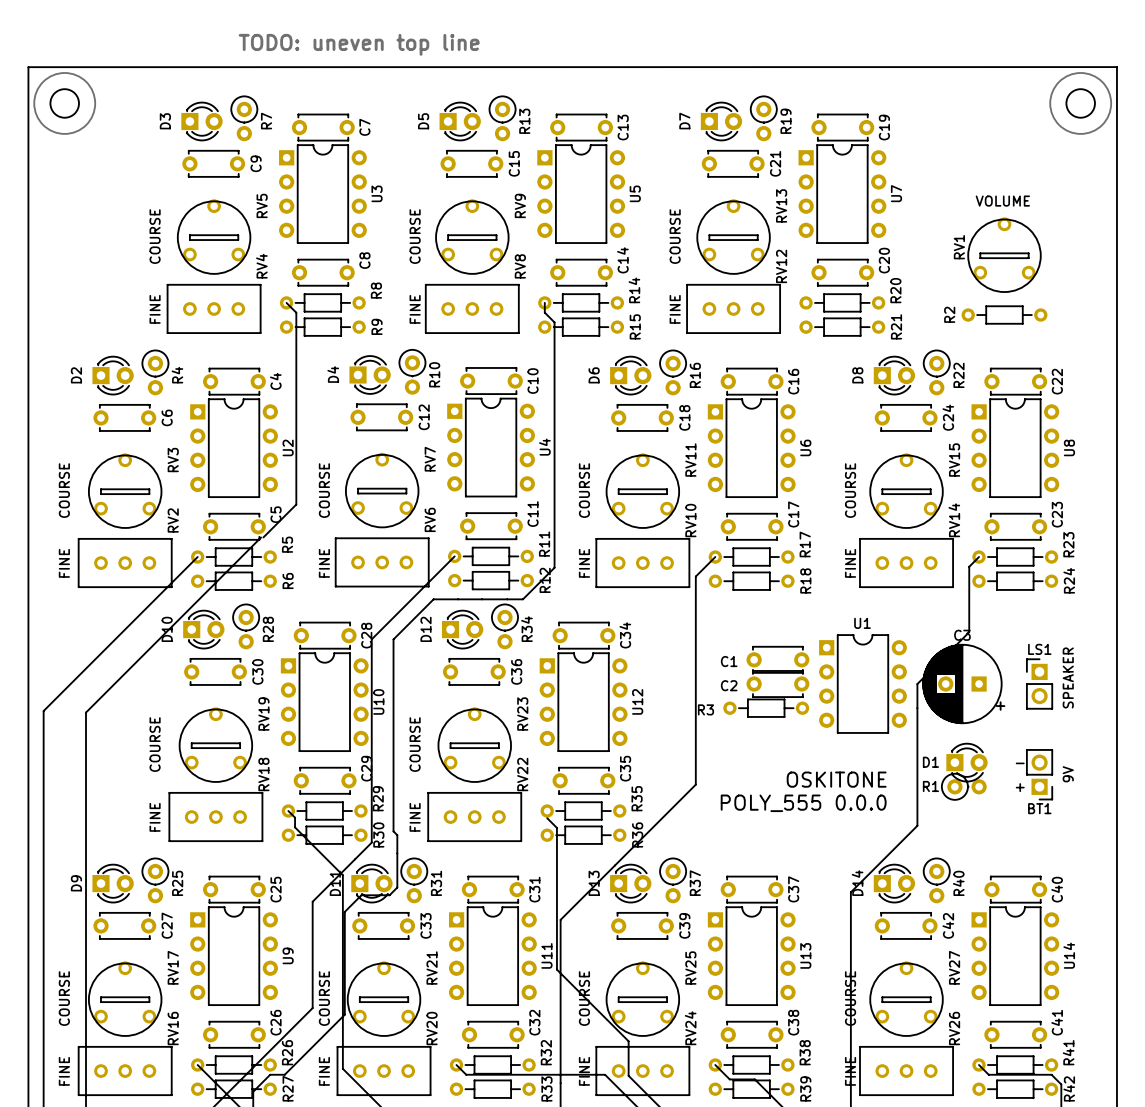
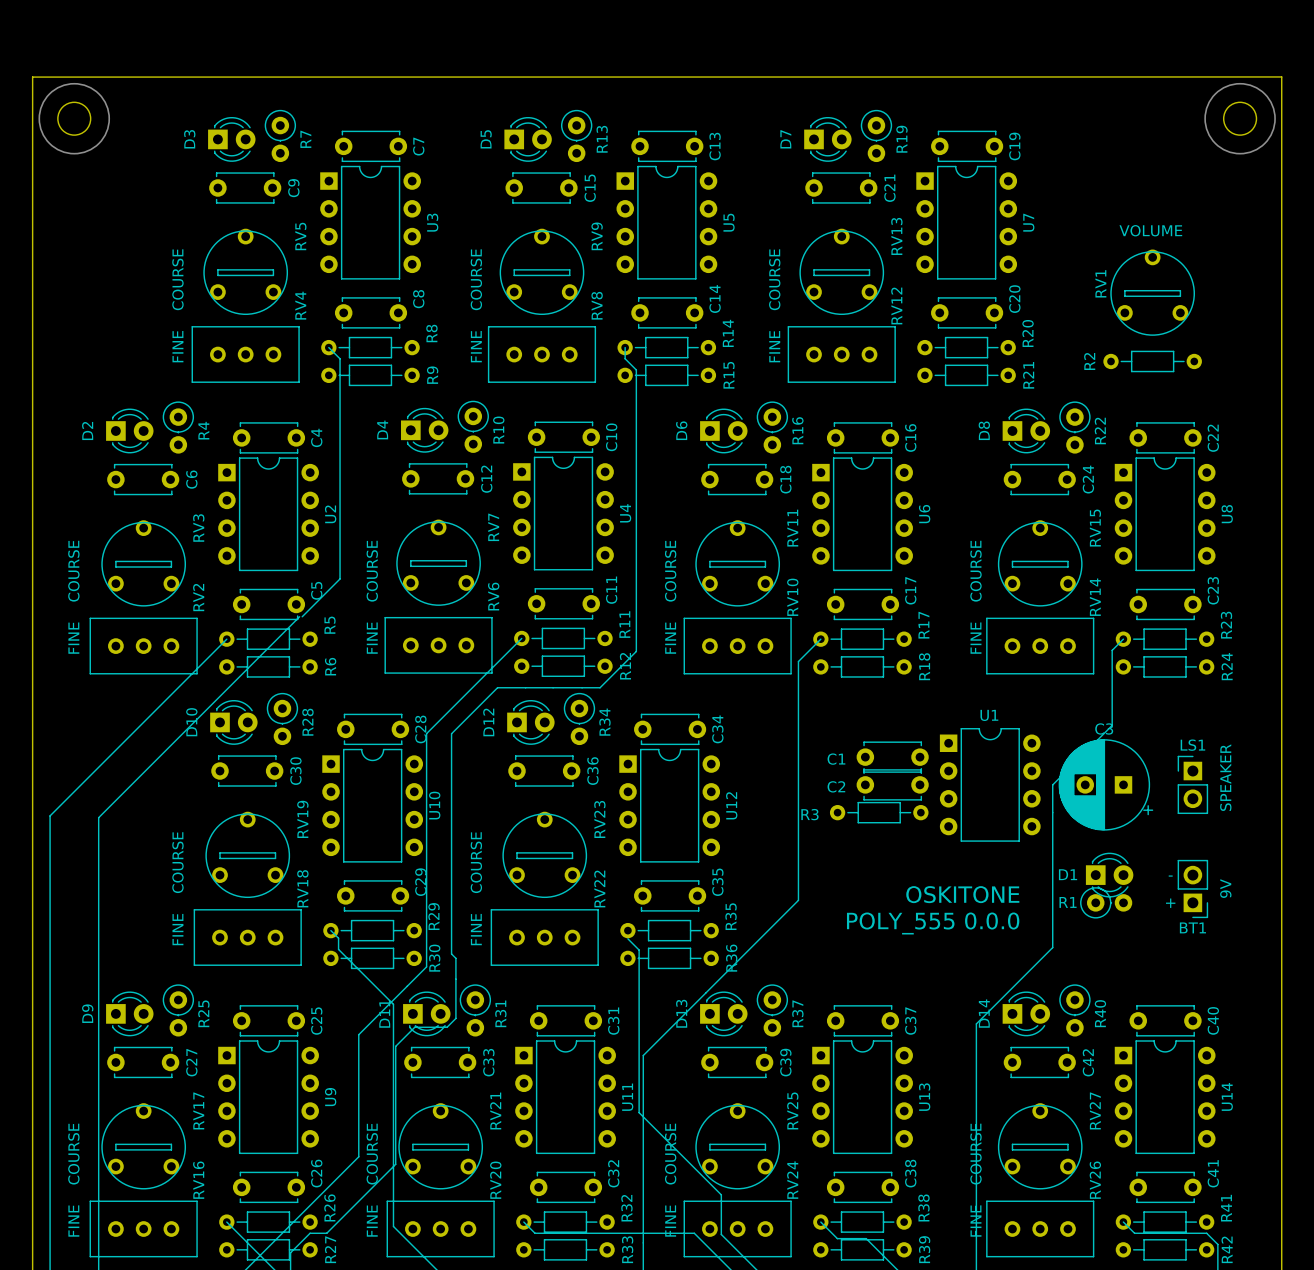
text: TODO: uneven top line (359, 44) -> none

